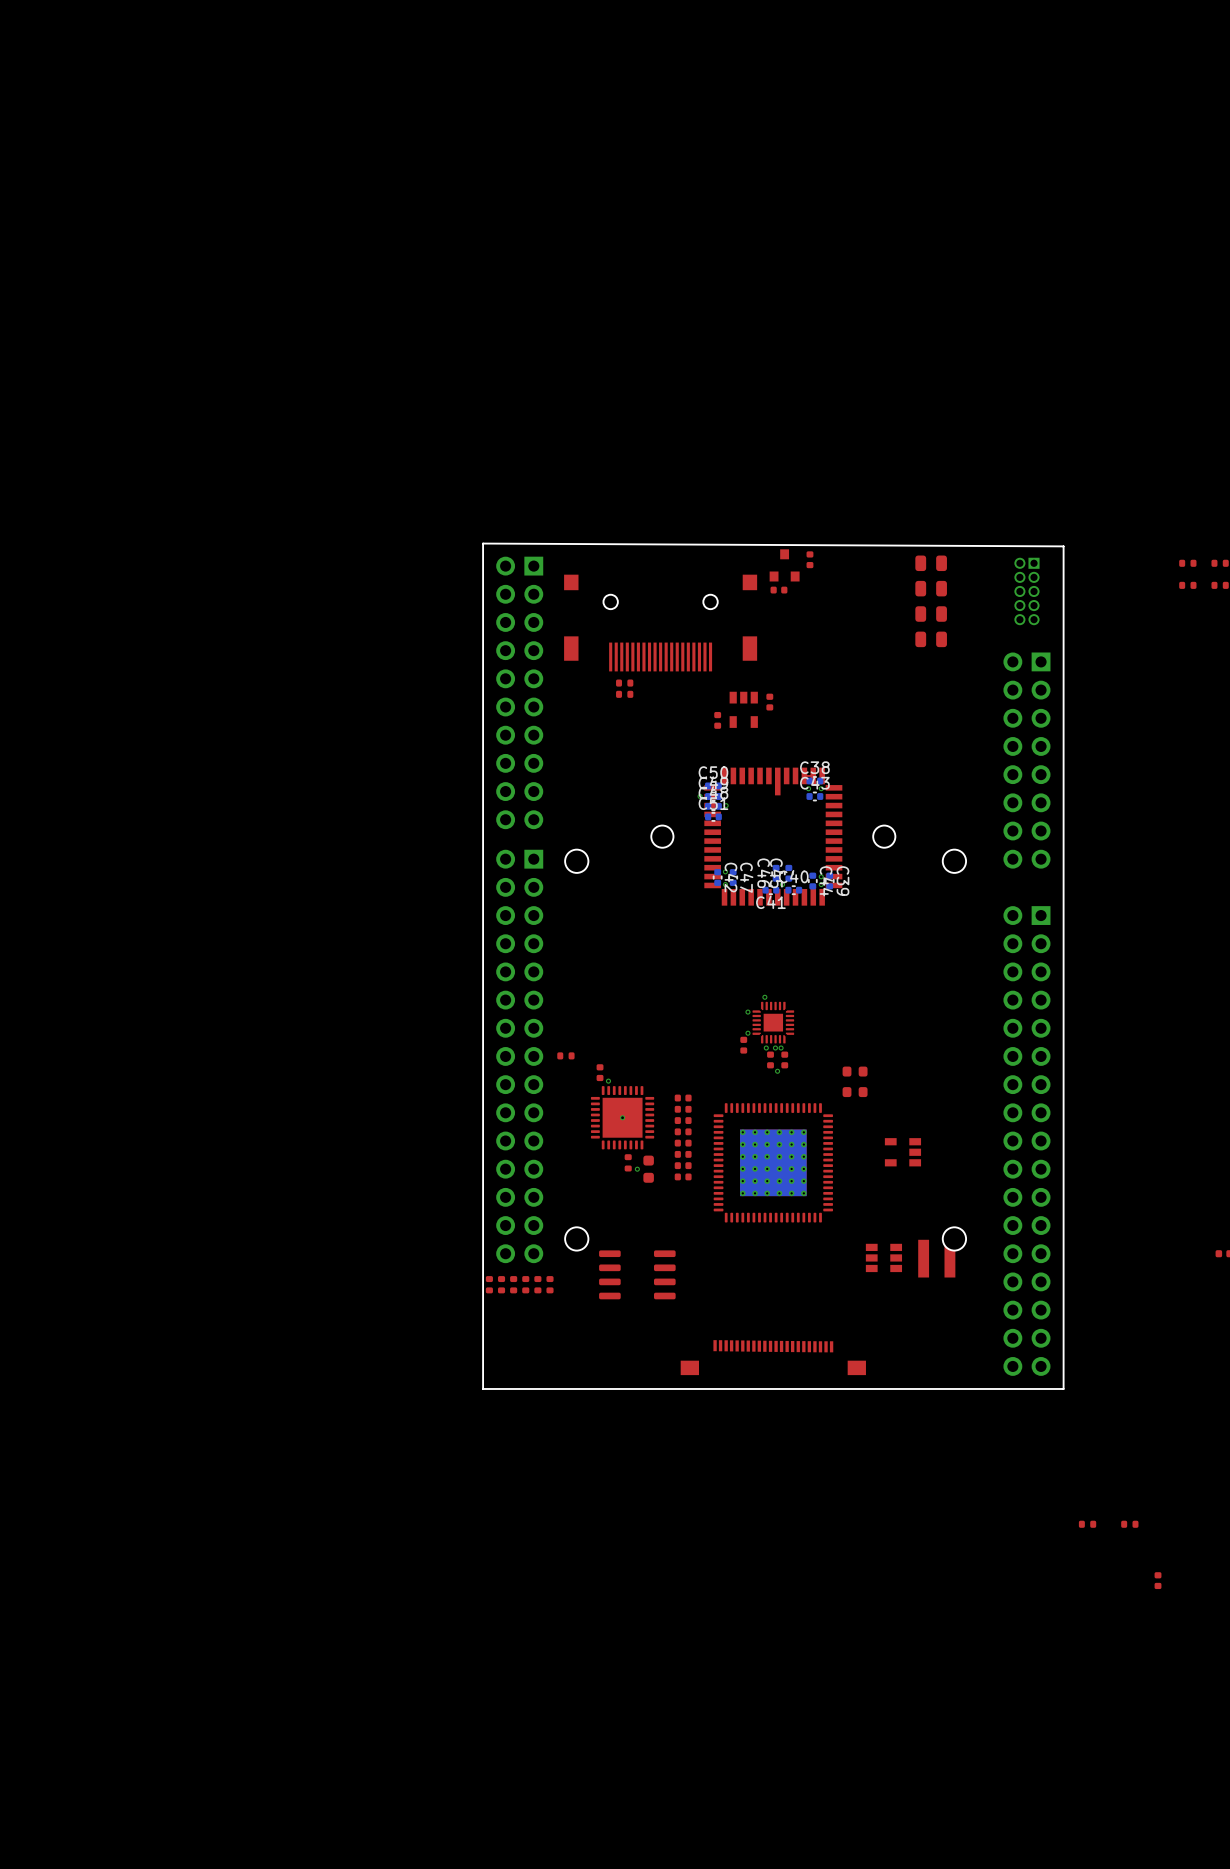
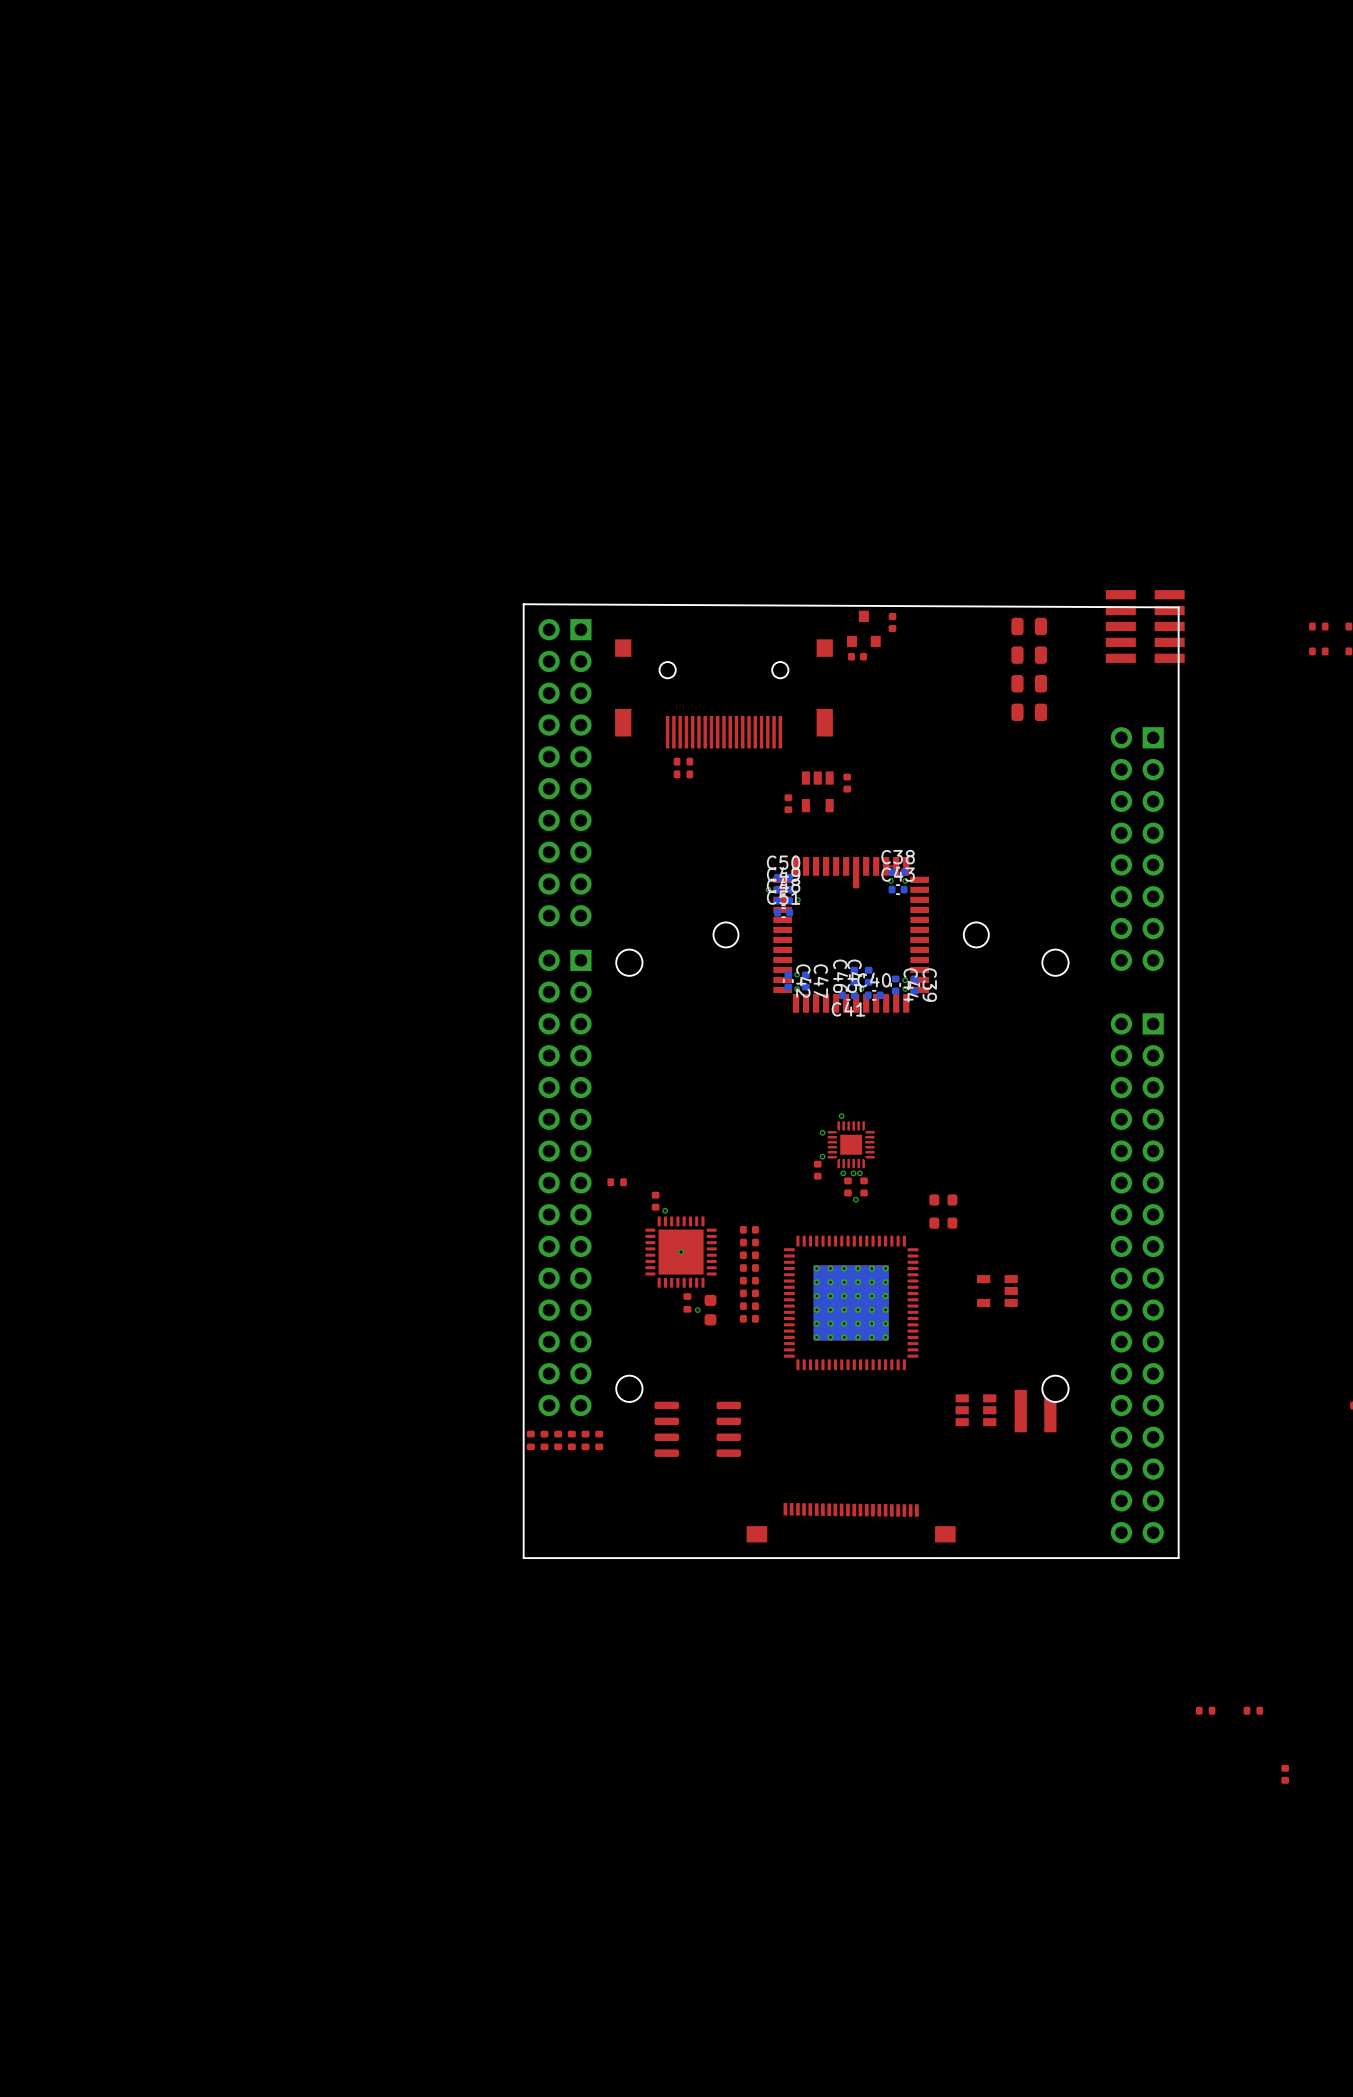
part: none -> (1145, 626)
part: (1026, 591) -> none

